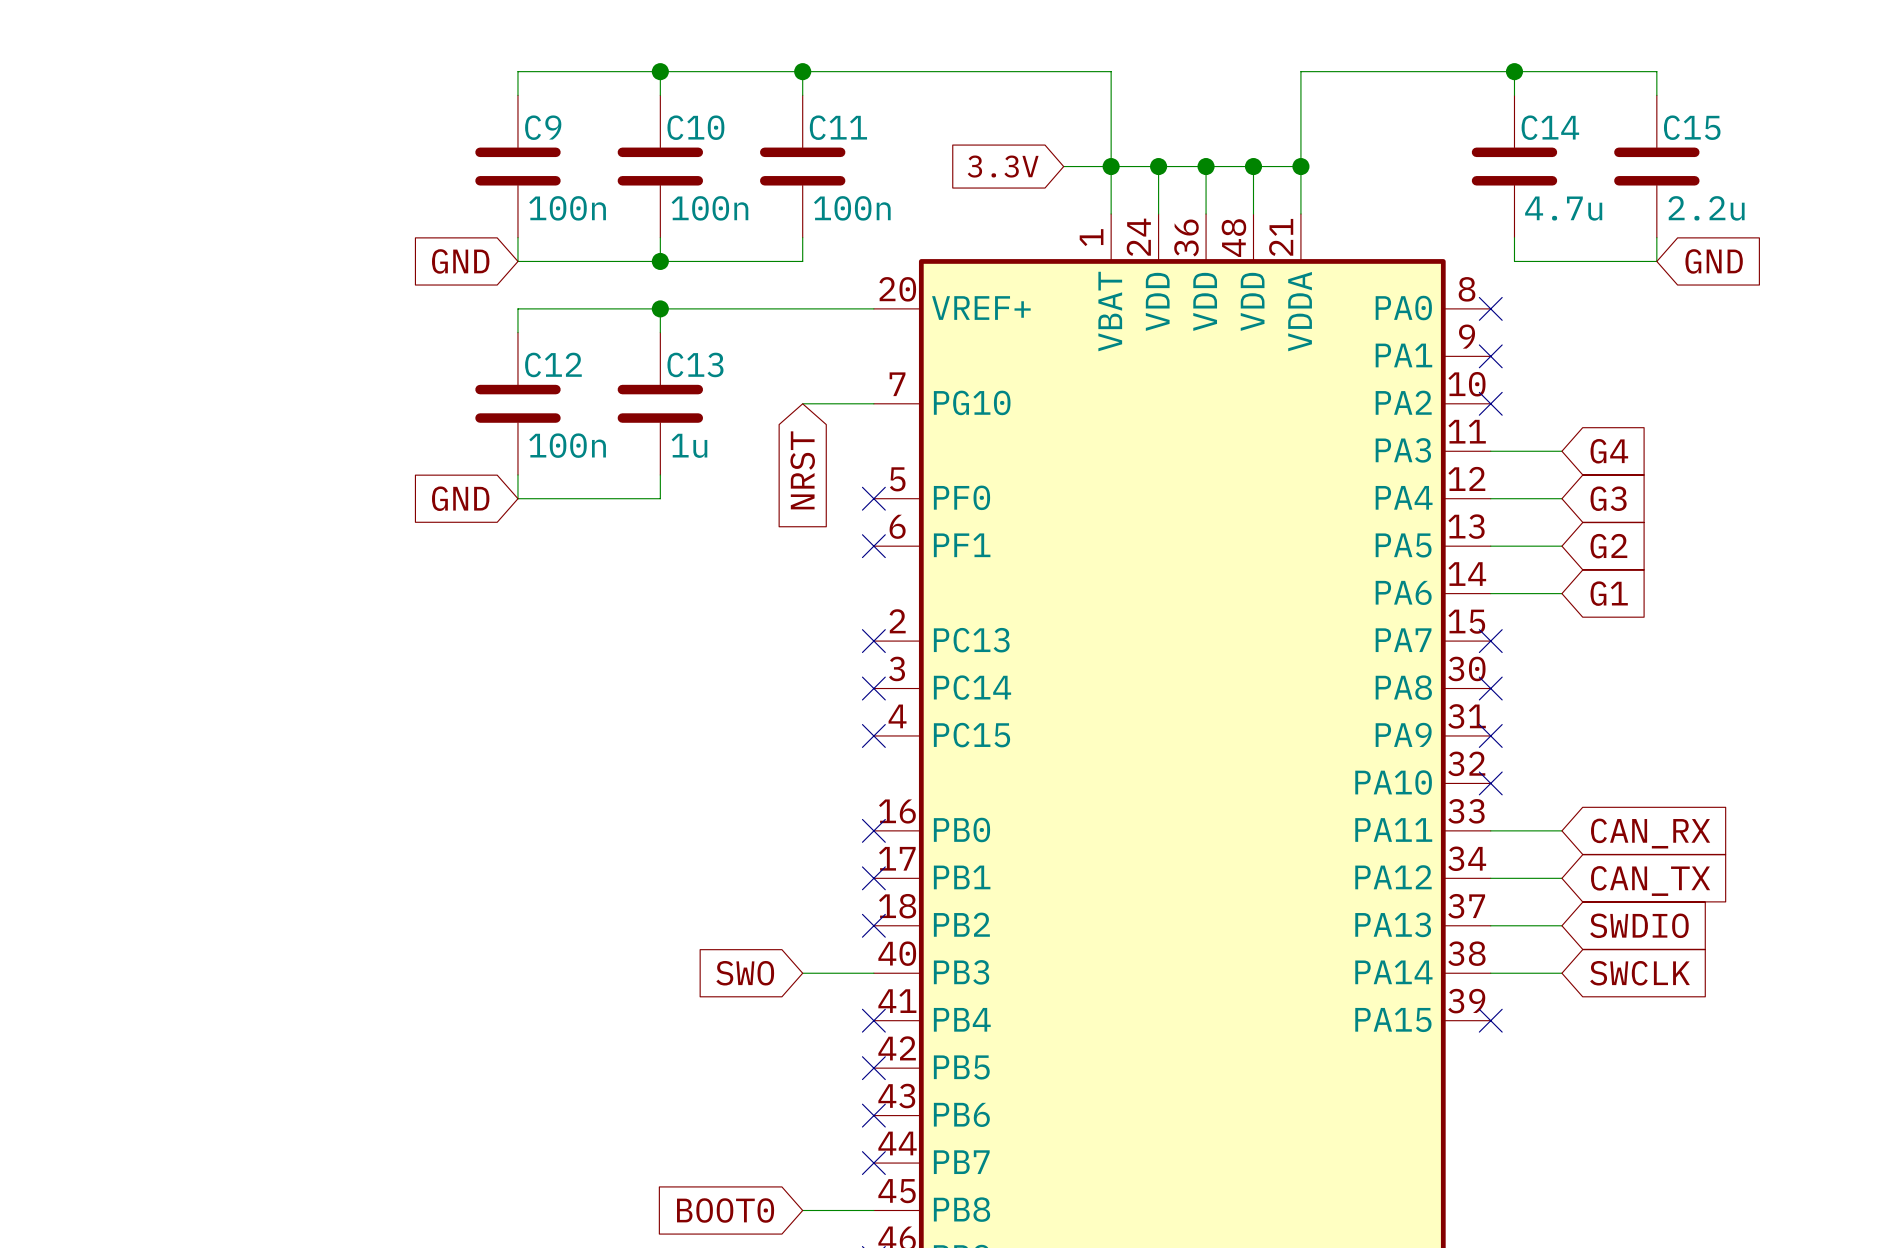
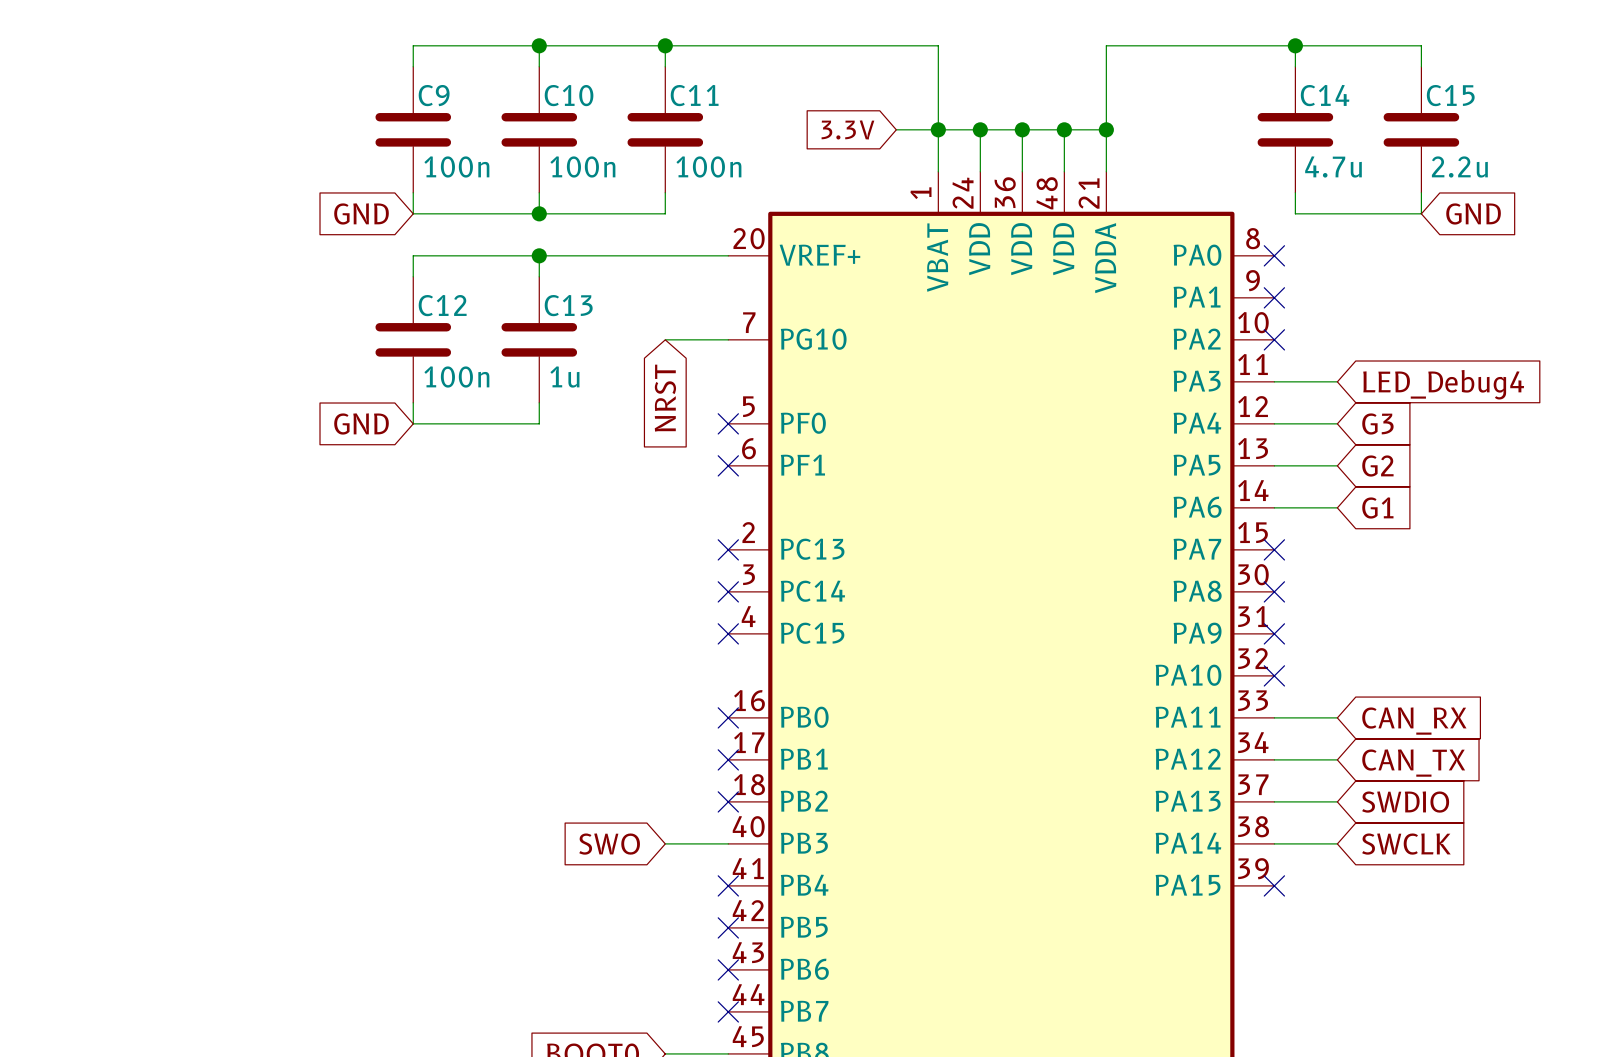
global label: G4 (1609, 451) -> LED_Debug4 (1443, 384)

